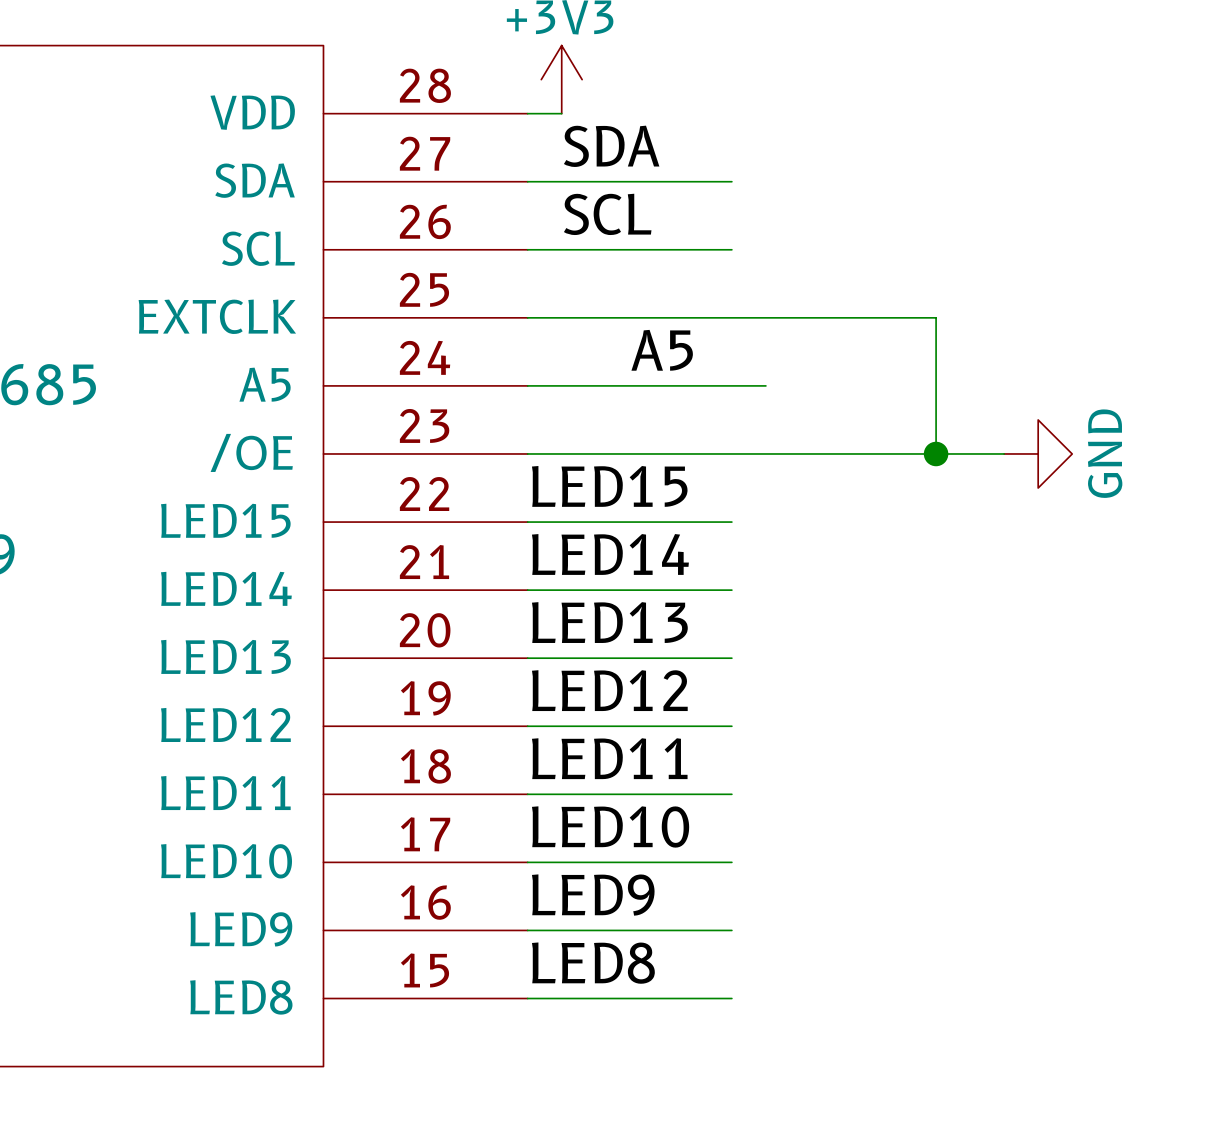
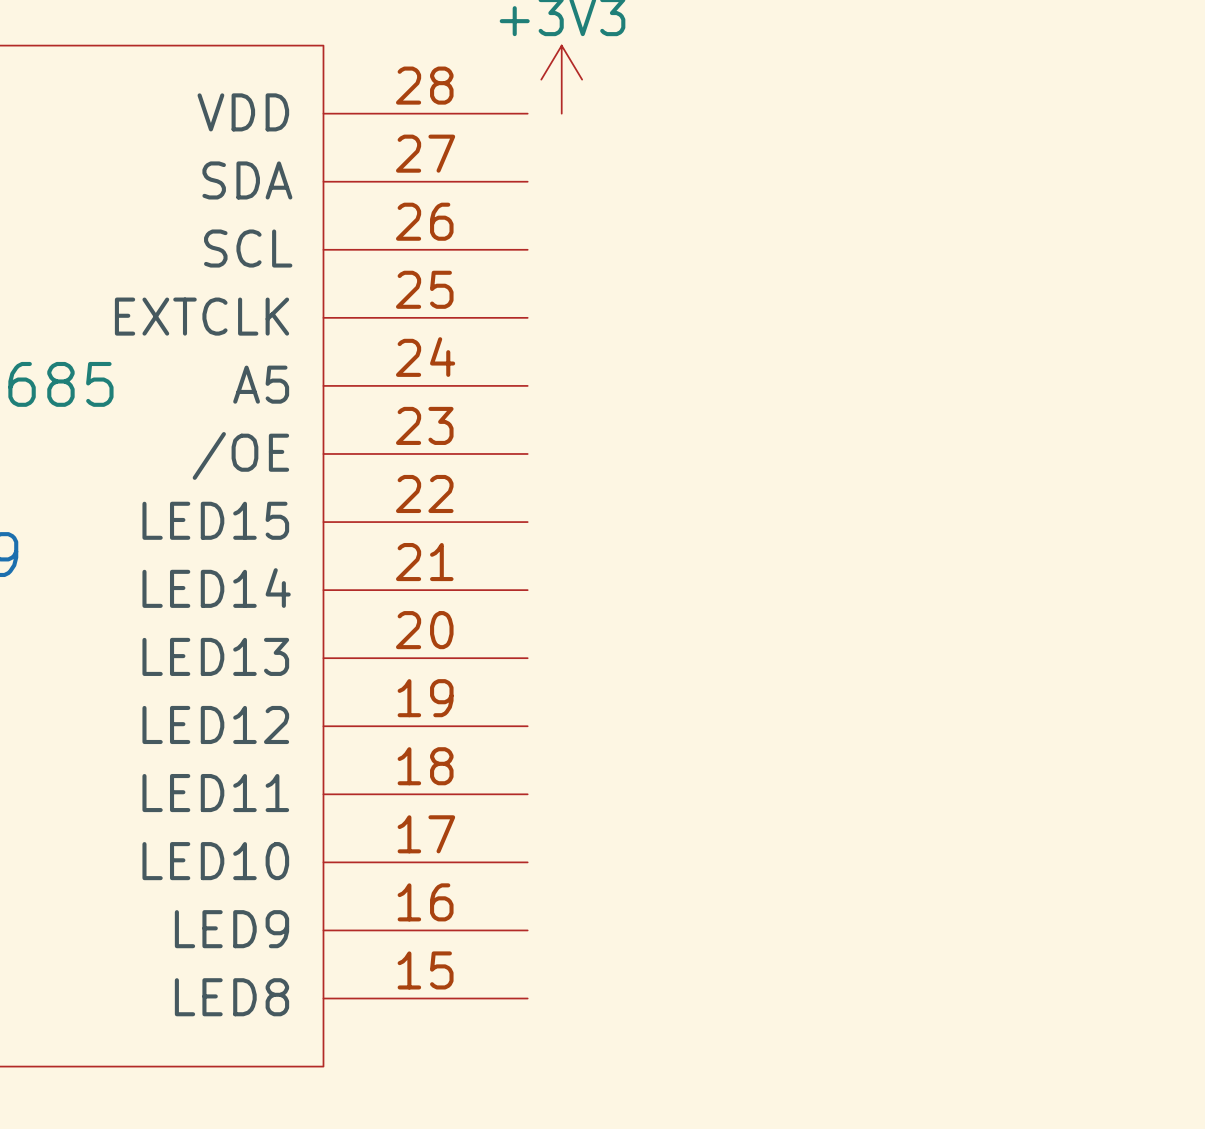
wire: (527, 113) (561, 113) -> none
label: SDA (611, 146) -> none
wire: (527, 181) (731, 181) -> none
label: SCL (607, 214) -> none
wire: (527, 249) (731, 249) -> none
wire: (527, 317) (936, 317) (936, 453) -> none
label: A5 (662, 350) -> none
wire: (527, 385) (765, 385) -> none
wire: (527, 453) (1004, 453) -> none
junction: (936, 453) -> none
power symbol: GND (1038, 453) -> none
label: LED15 (609, 486) -> none
wire: (527, 522) (731, 522) -> none
label: LED14 (610, 554) -> none
wire: (527, 590) (731, 590) -> none
label: LED13 (609, 622) -> none
wire: (527, 658) (731, 658) -> none
label: LED12 (609, 690) -> none
wire: (527, 726) (731, 726) -> none
label: LED11 (609, 758) -> none
wire: (527, 794) (731, 794) -> none
label: LED10 (610, 826) -> none
wire: (527, 862) (731, 862) -> none
label: LED9 (593, 895) -> none
wire: (527, 930) (731, 930) -> none
label: LED8 (593, 963) -> none
wire: (527, 998) (731, 998) -> none

